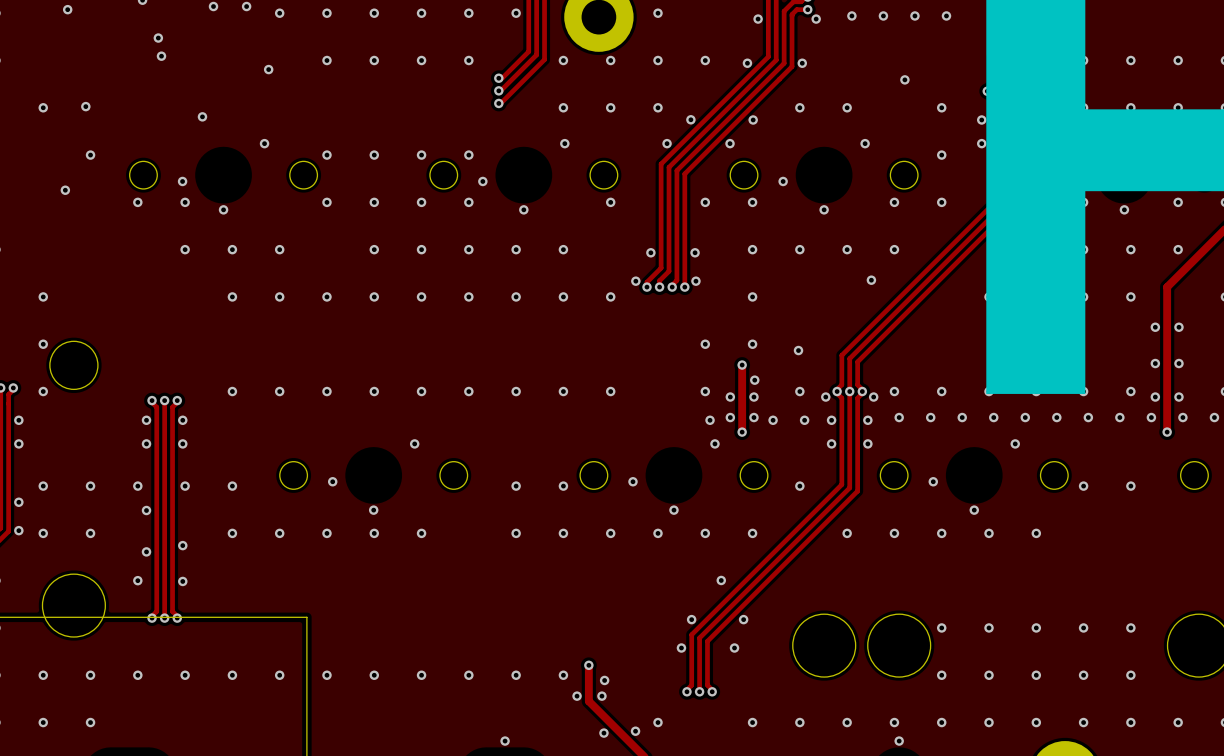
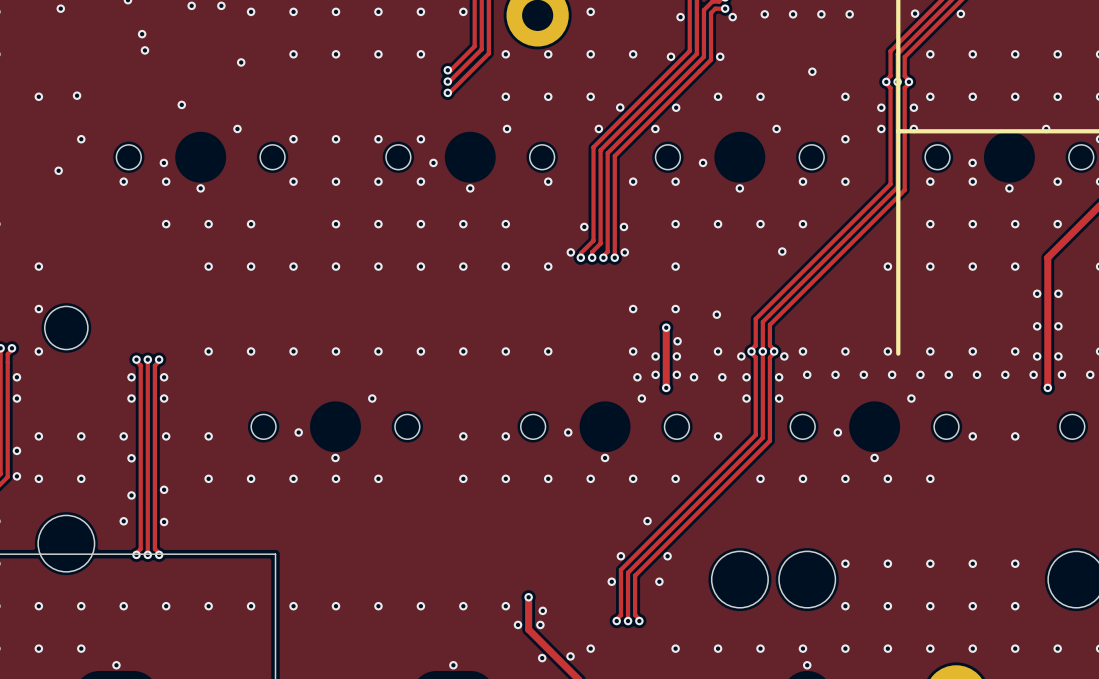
via: none -> (116, 665)

